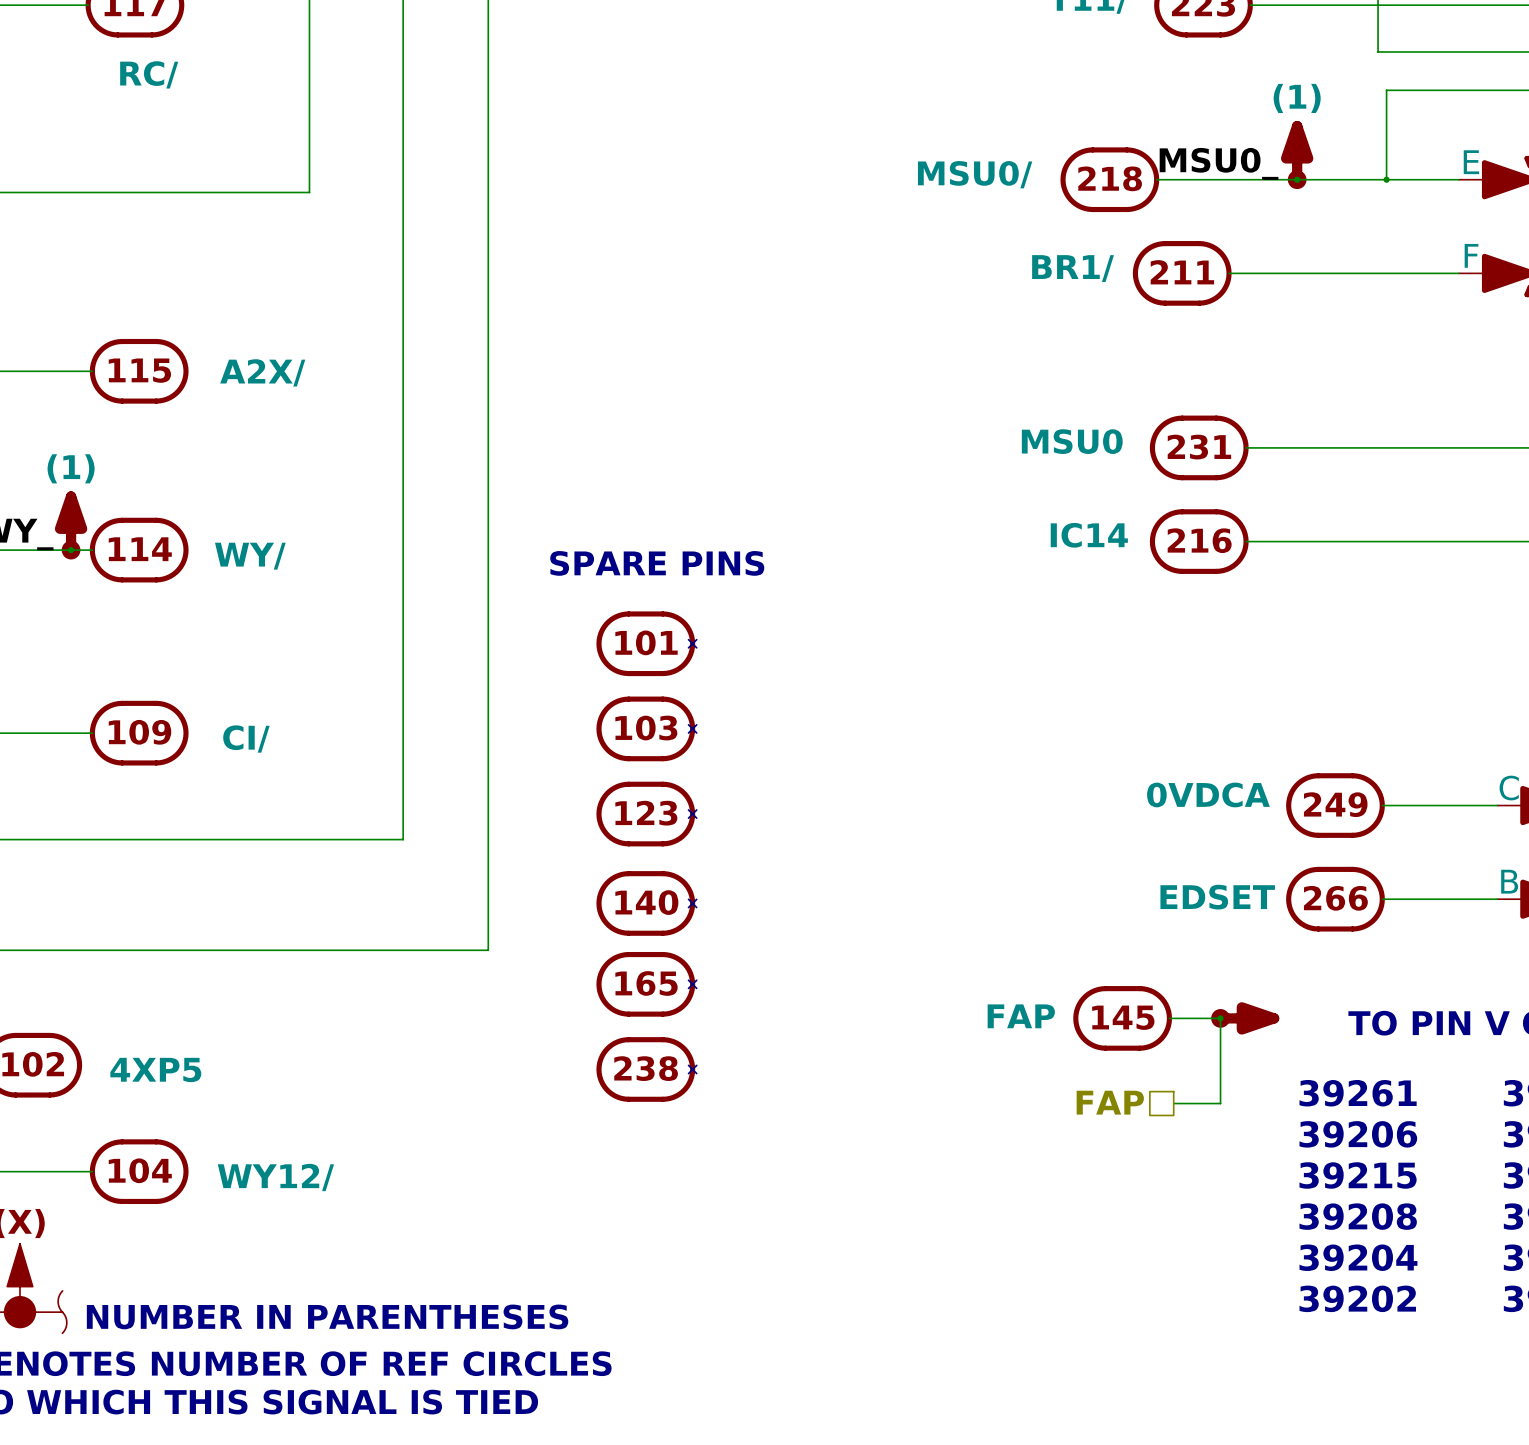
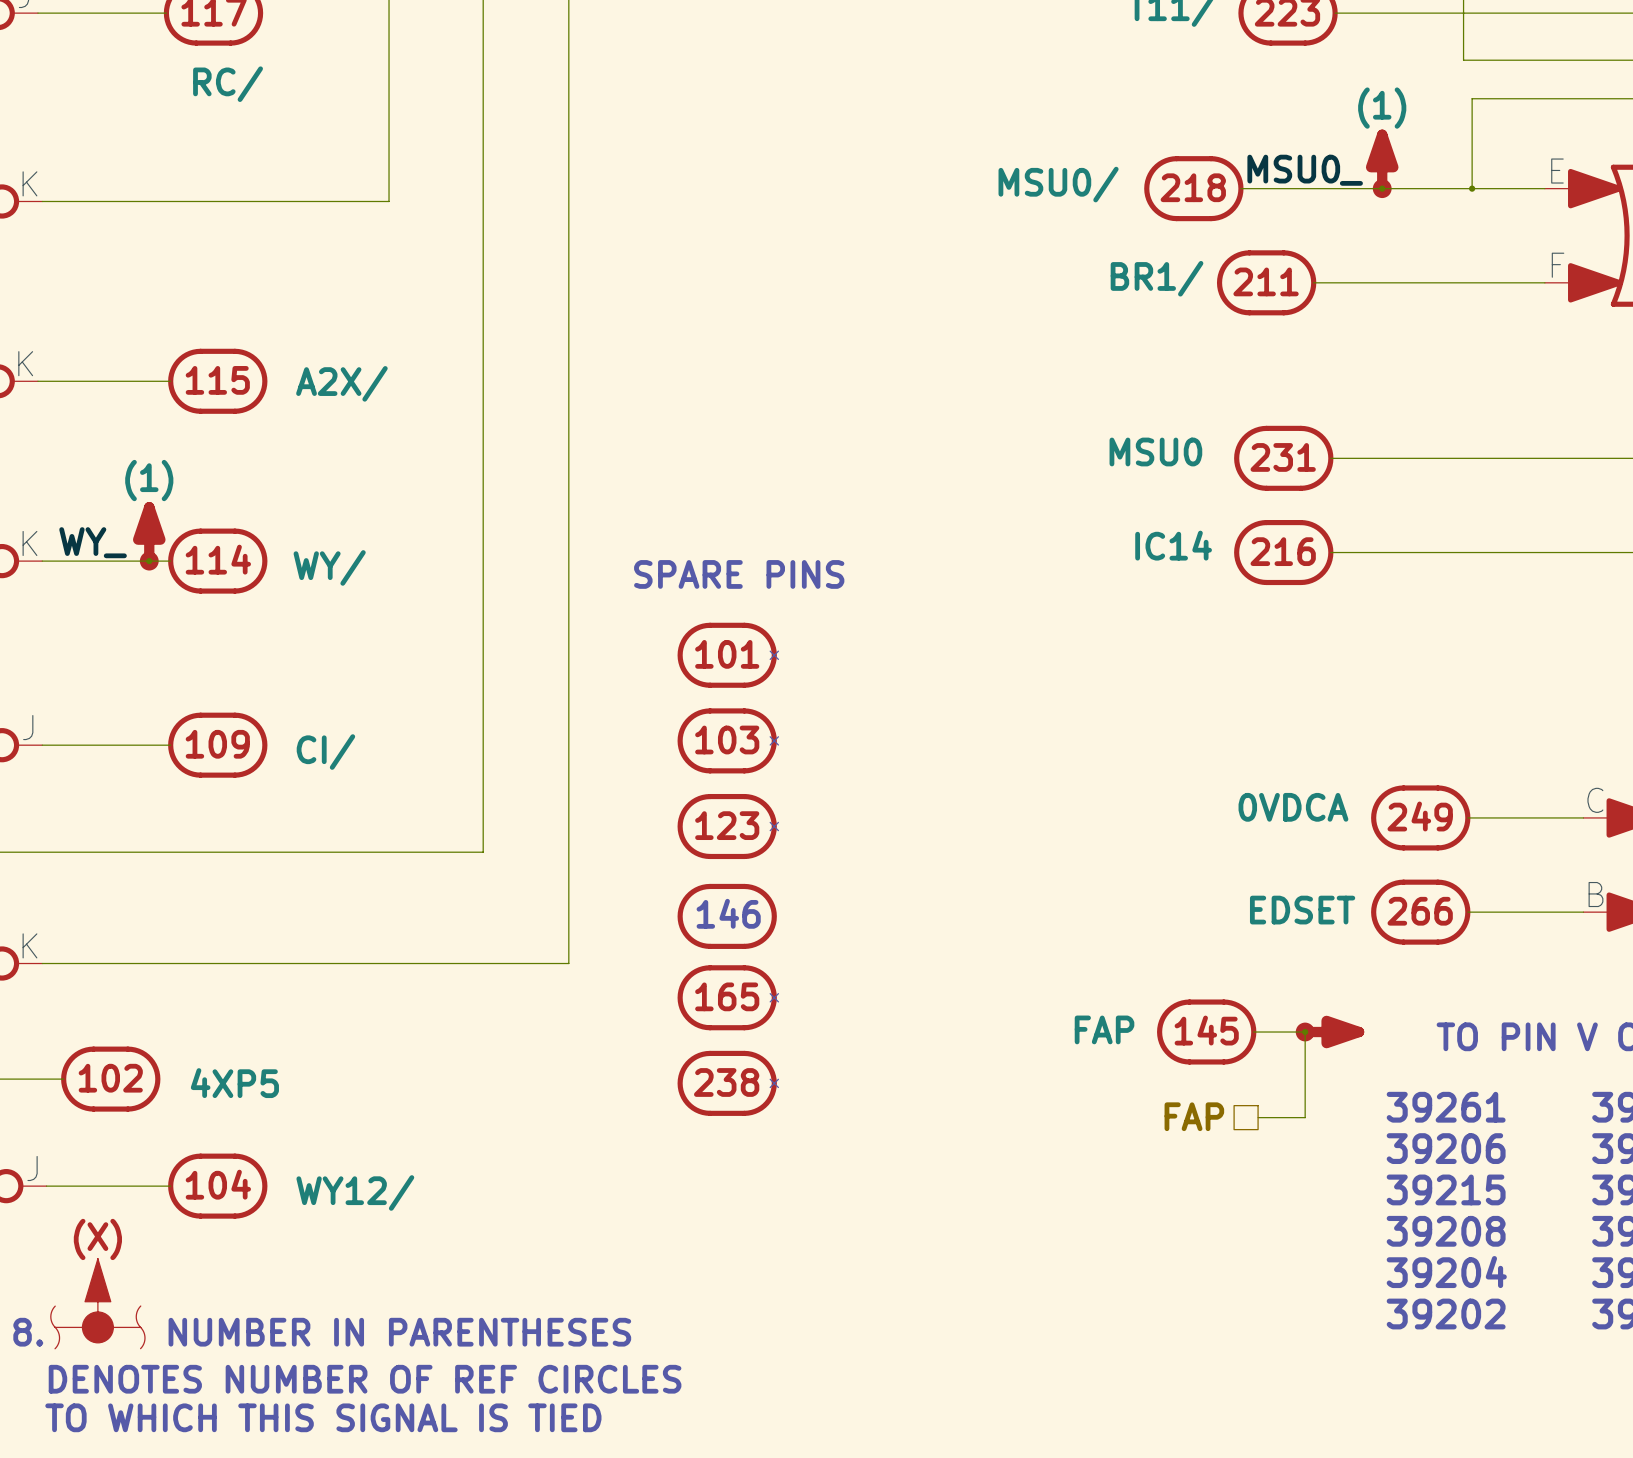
text: none -> 146 (728, 913)
part text: 140 (646, 902) -> none
no-connect mark: (692, 903) -> none

